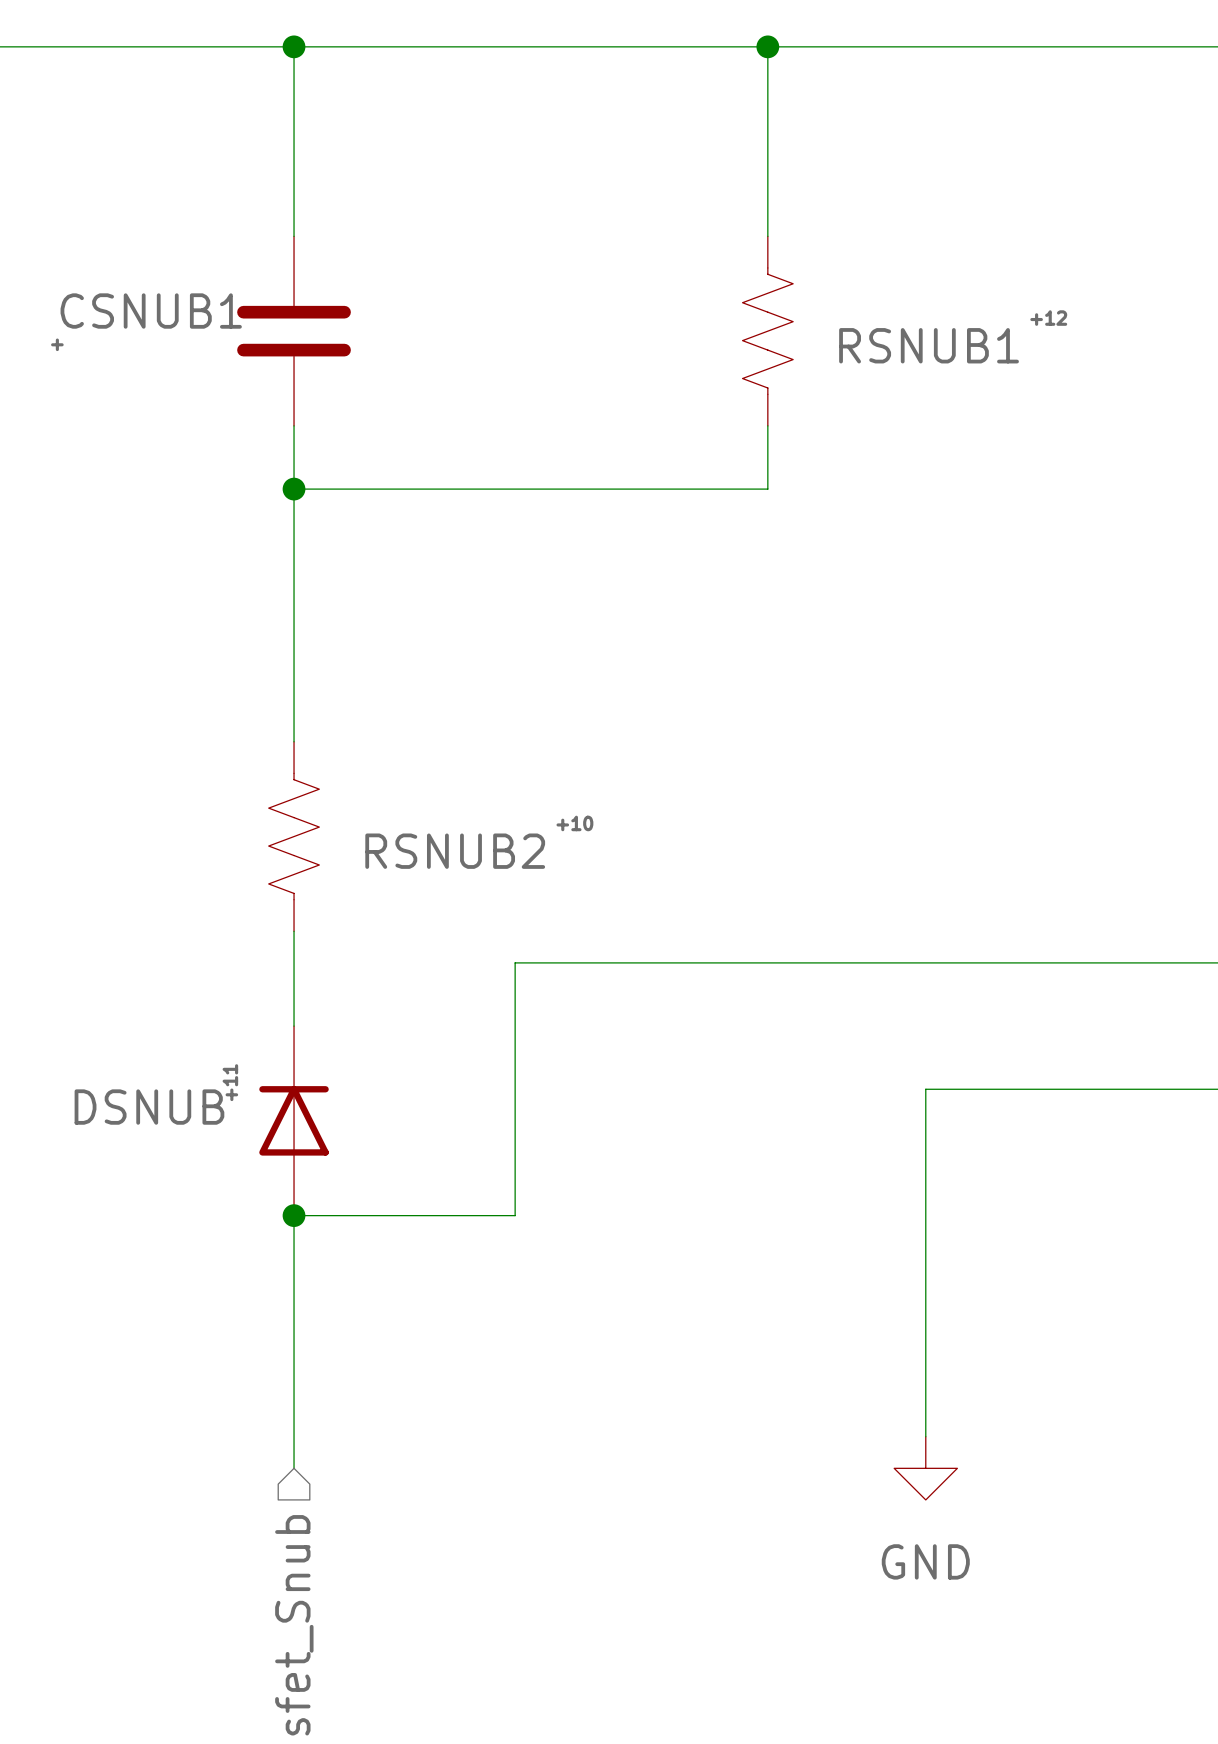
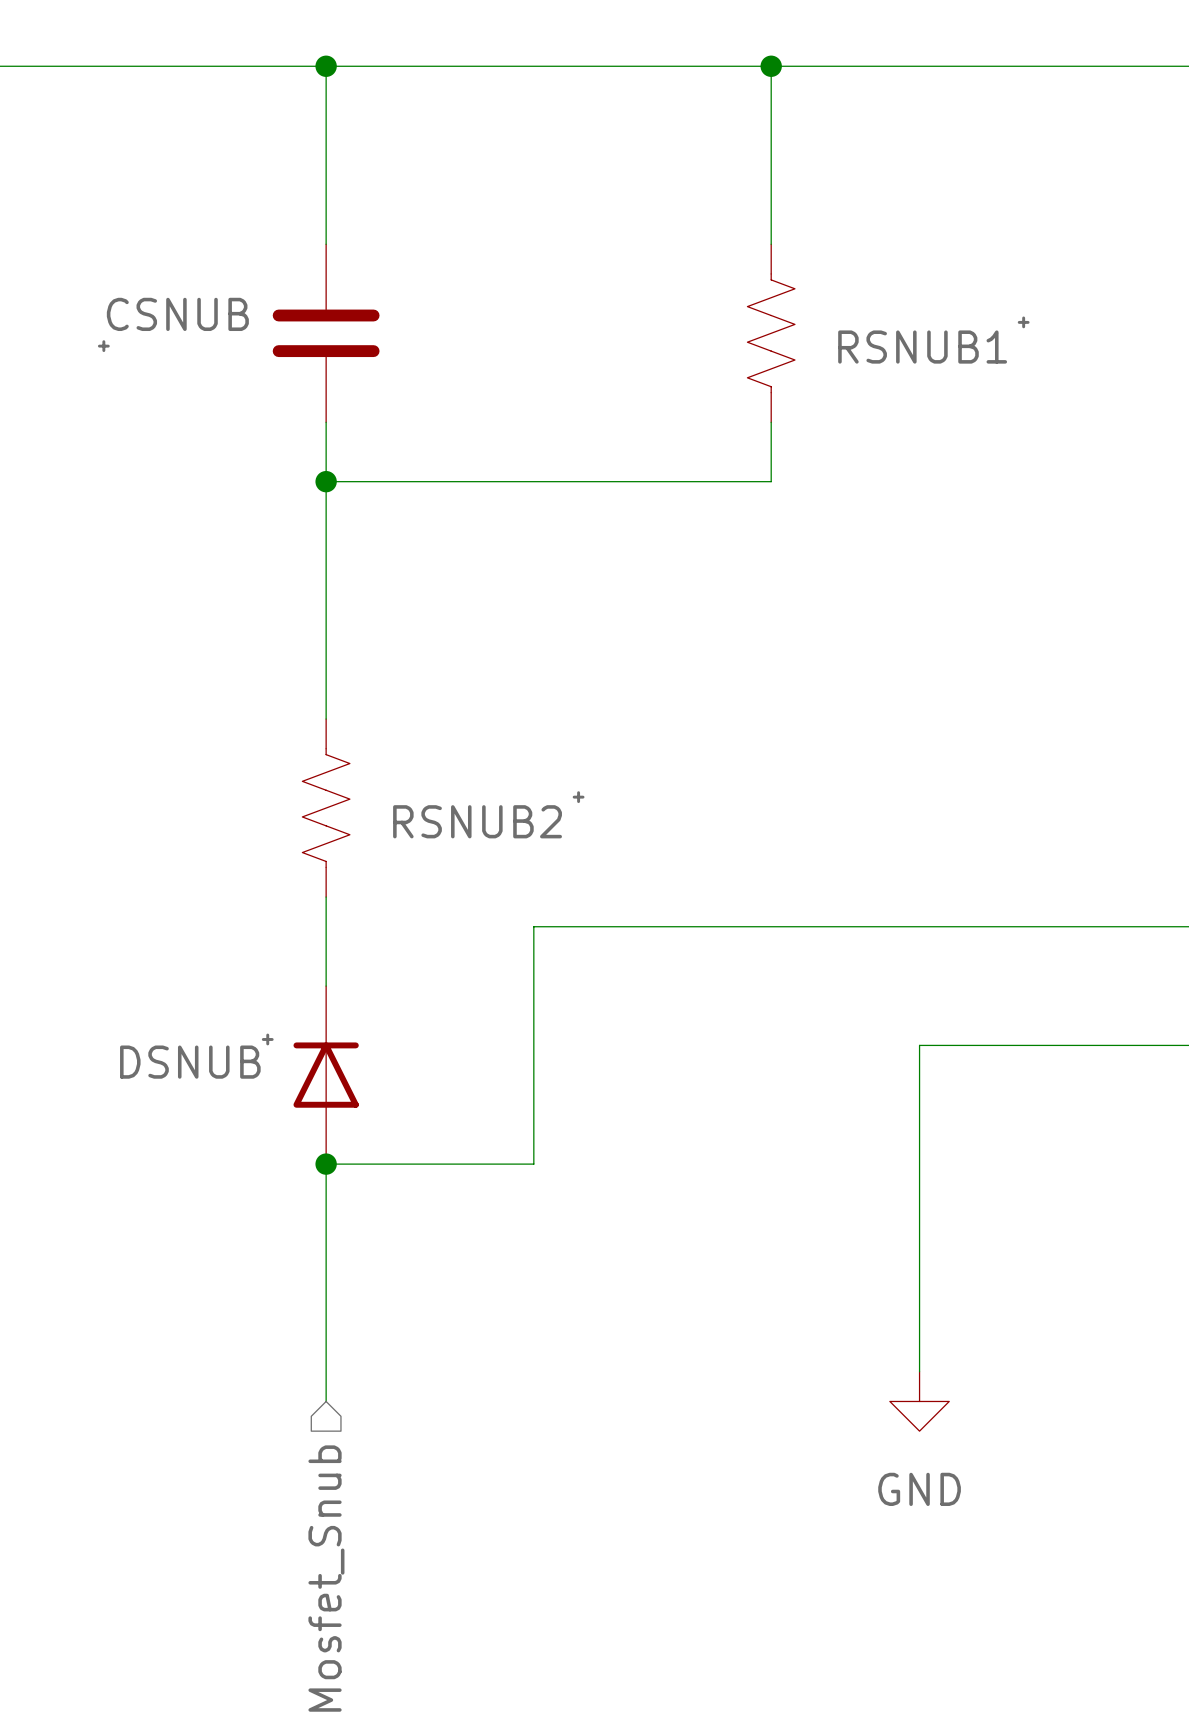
CSNUB1 name: CSNUB1 (151, 311) -> CSNUB (177, 314)
+12 name: +12 (1048, 318) -> + (1023, 322)
+10 name: +10 (574, 823) -> + (578, 797)
+11 name: +11 (230, 1082) -> + (267, 1039)

